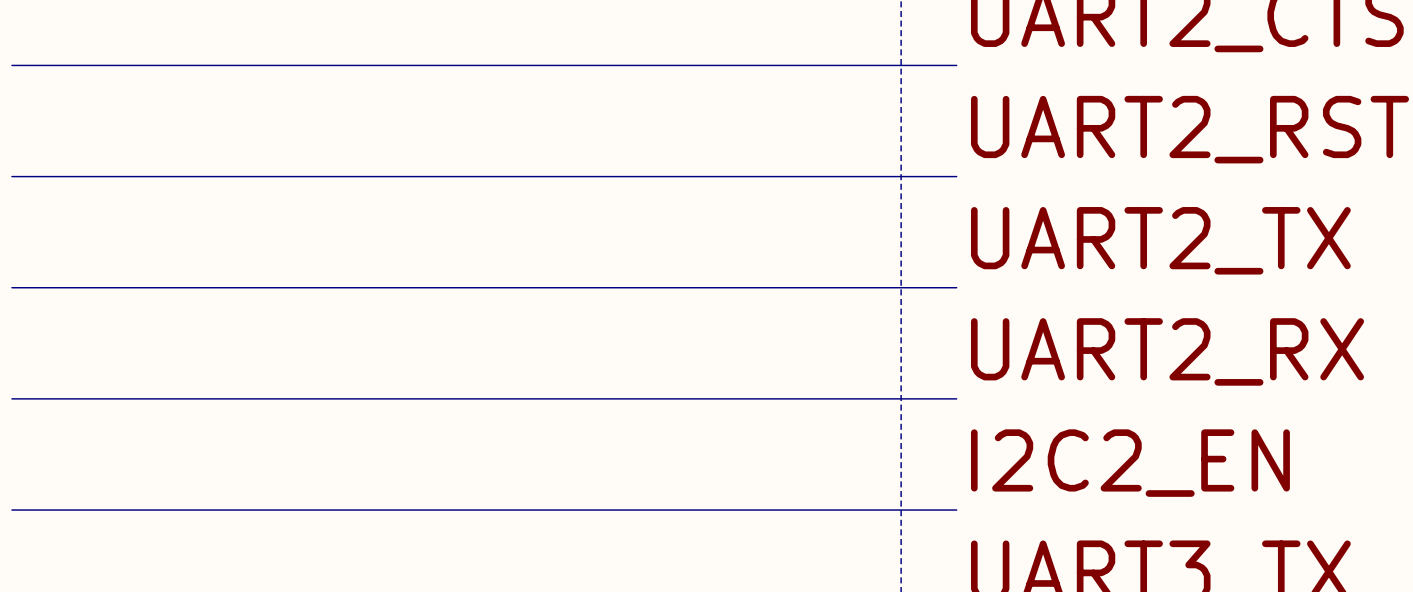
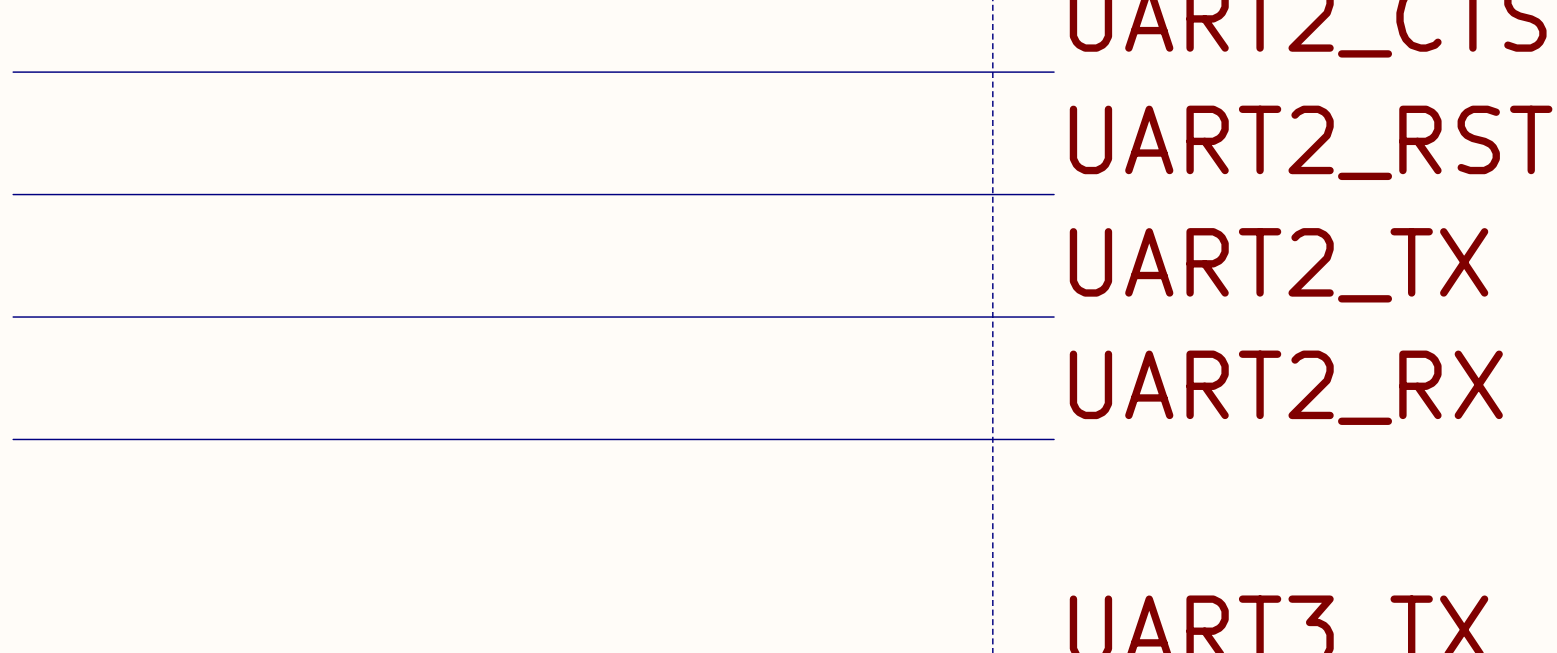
label: I2C2_EN (1130, 463) -> none
wire: (11, 510) (956, 510) -> none

